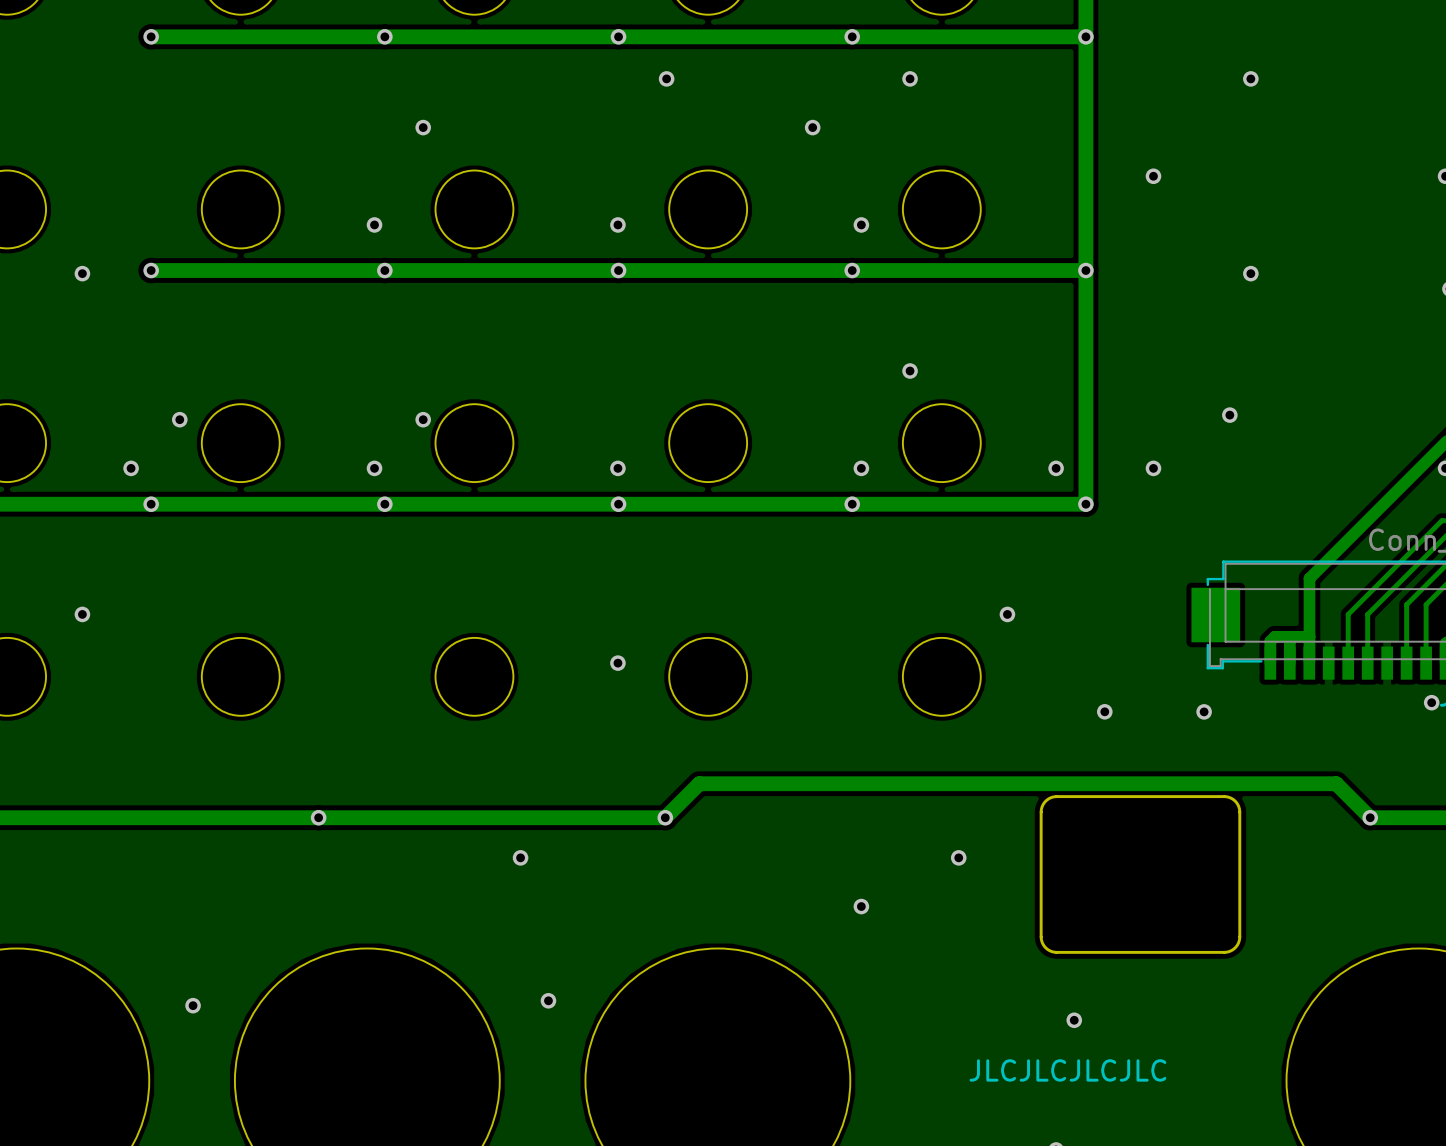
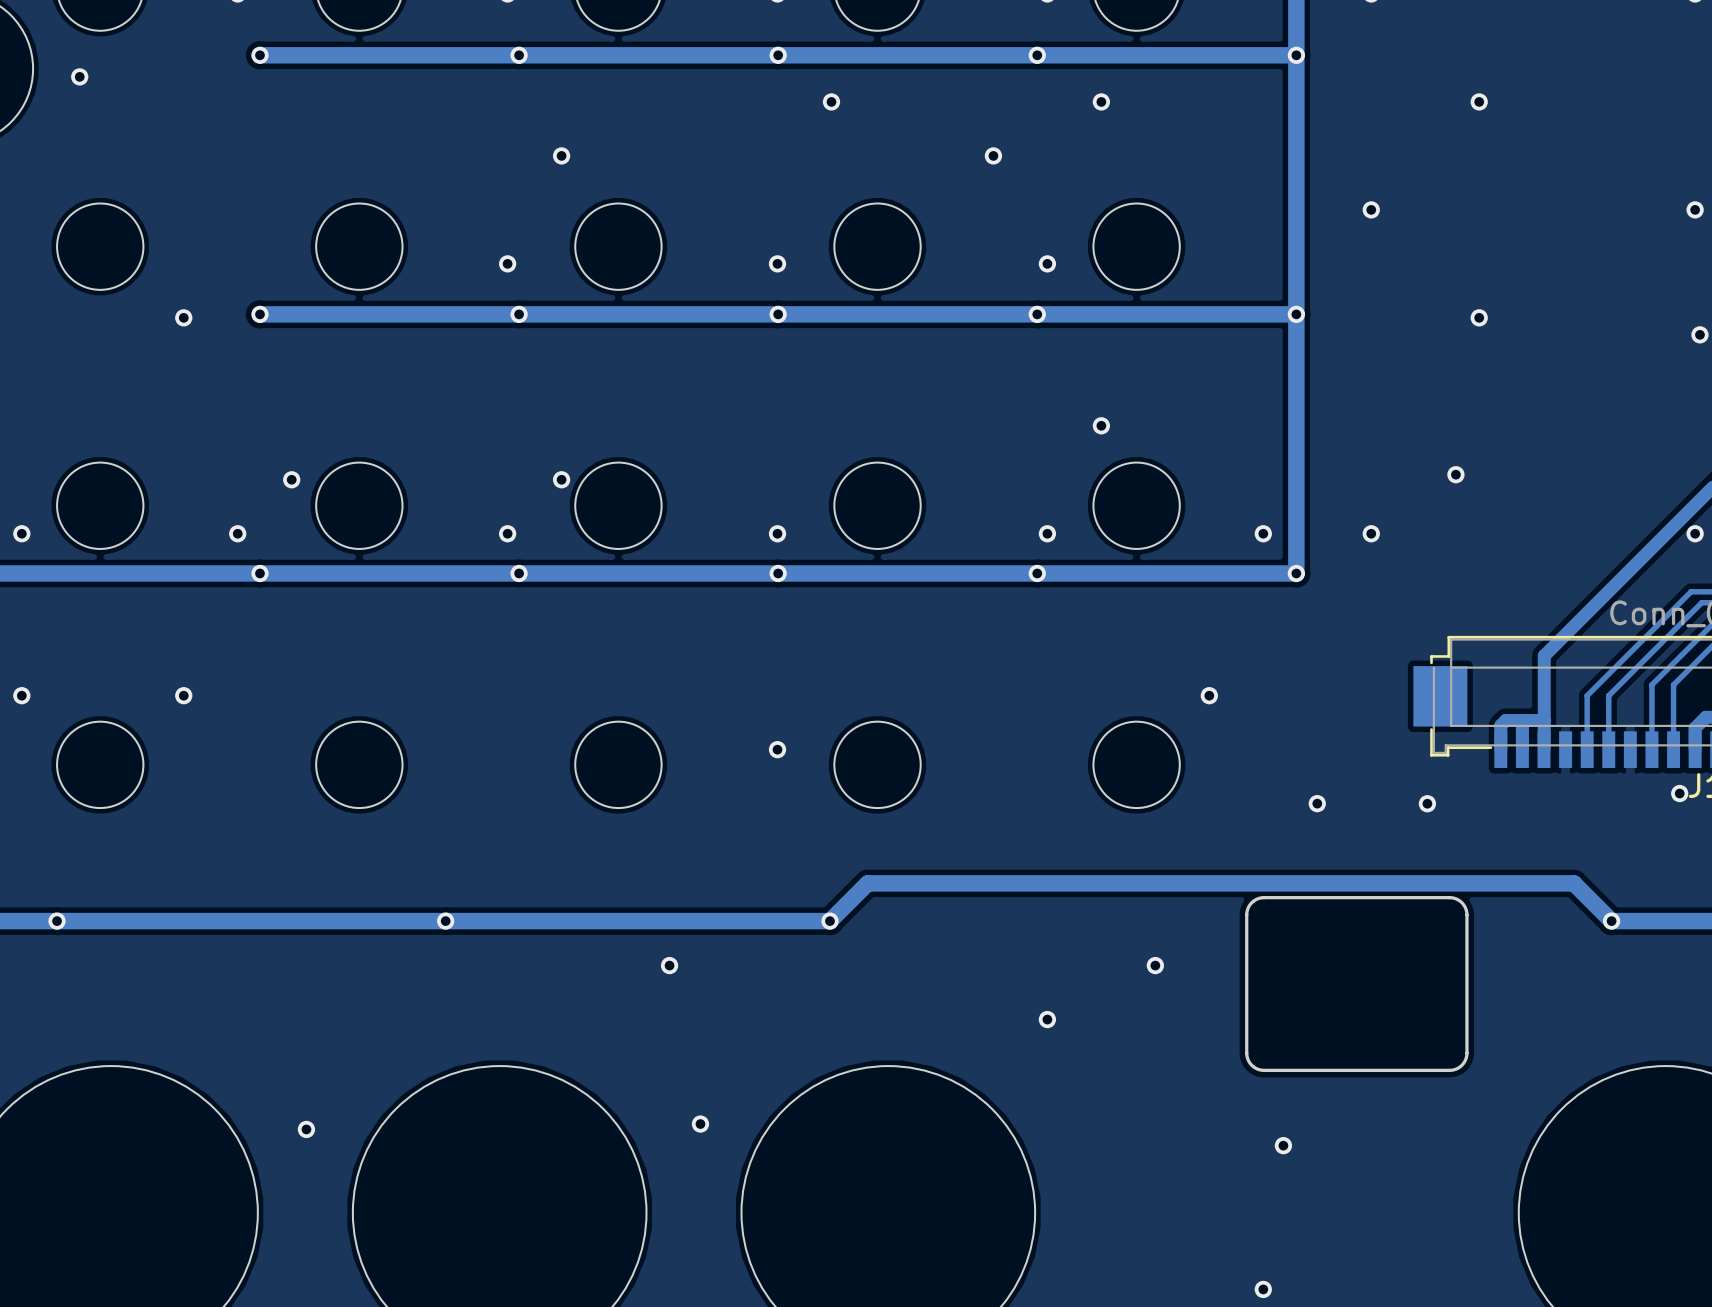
text: JLCJLCJLCJLC (1067, 1070) -> none

